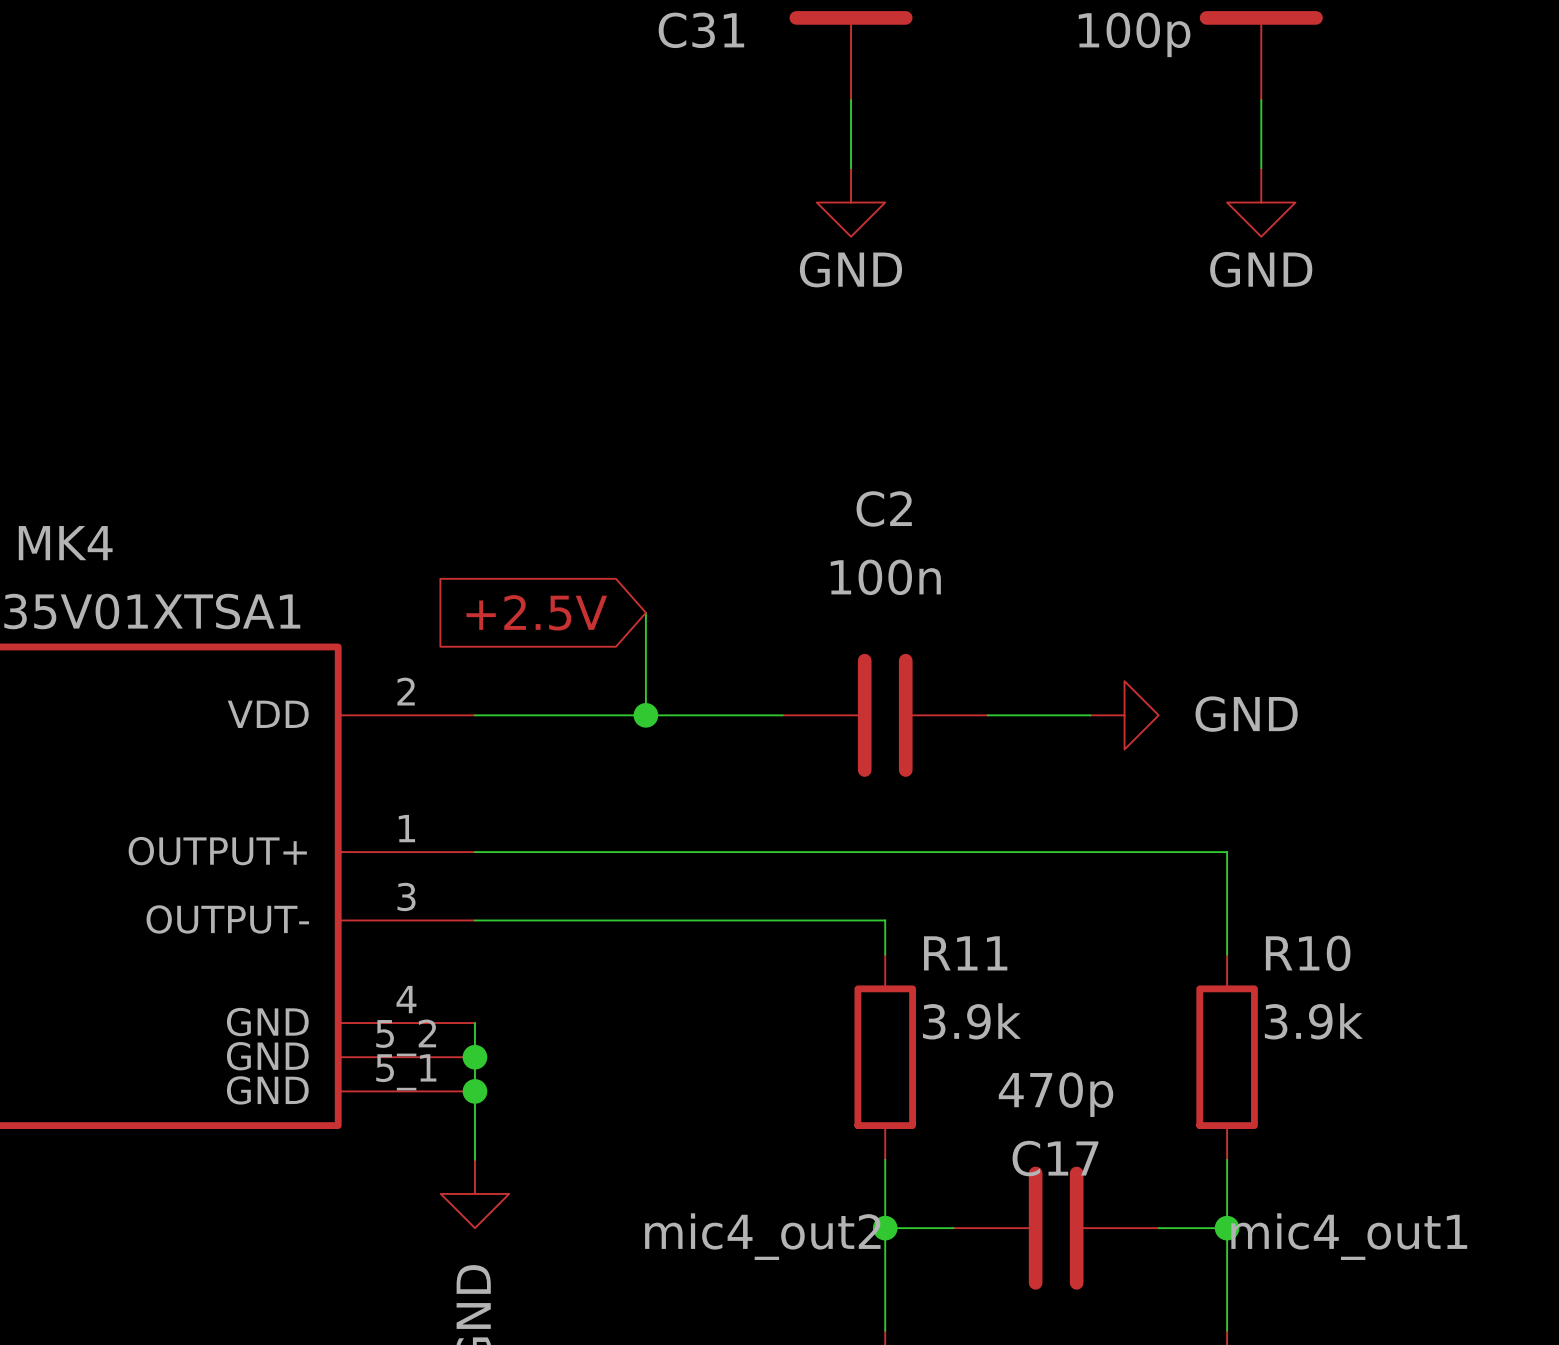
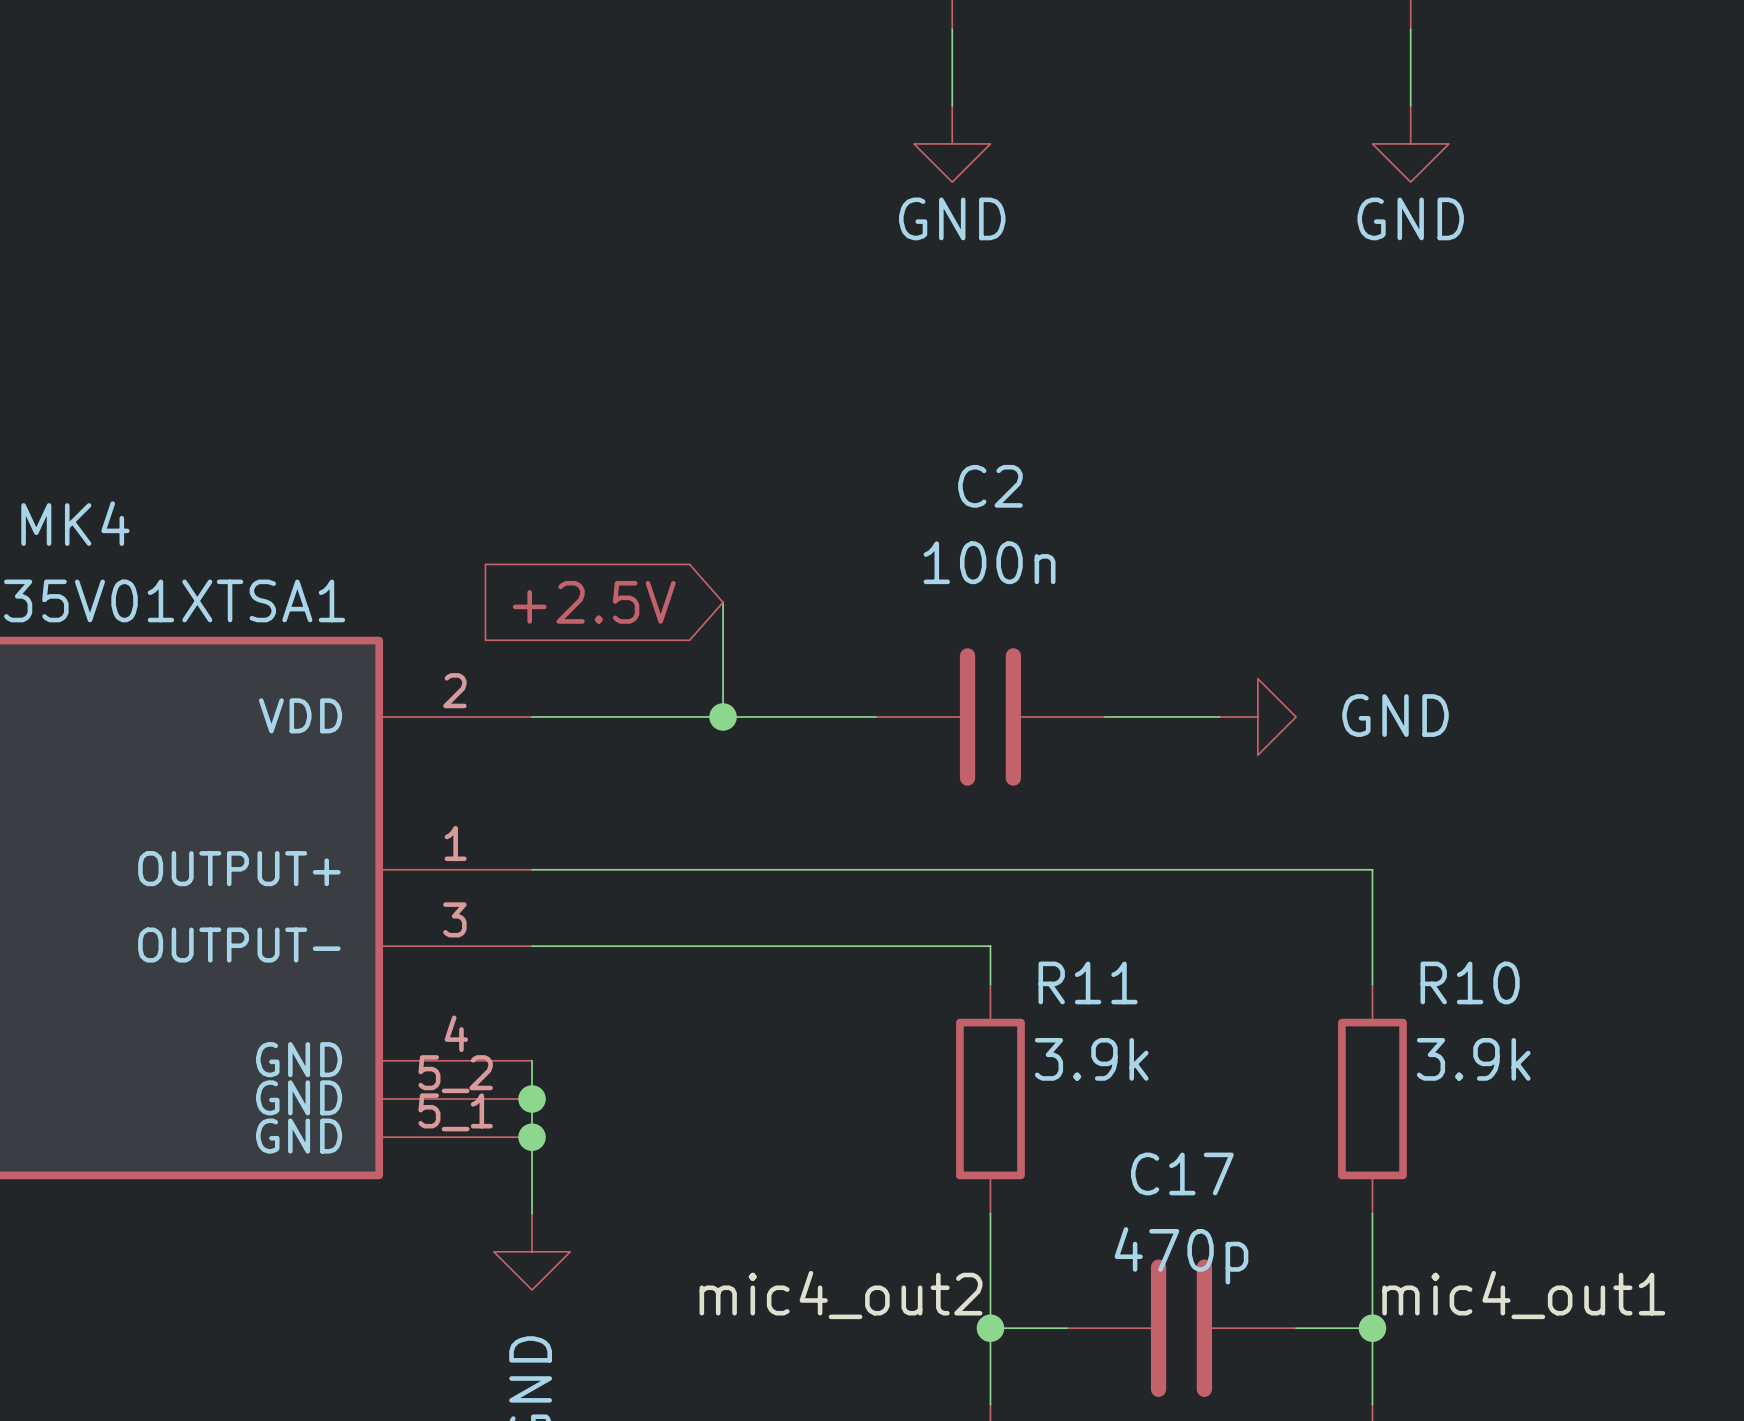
C17 value position: 470p (1056, 1094) -> 470p (1181, 1255)
C17 name position: C17 (1055, 1158) -> C17 (1182, 1173)
wire: (885, 1228) (953, 1228) -> (990, 1328) (1066, 1328)
junction position: (885, 1228) -> (990, 1328)
C17 position: (1056, 1228) -> (1181, 1328)
wire: (1158, 1228) (1227, 1228) -> (1296, 1328) (1372, 1328)
junction position: (1227, 1228) -> (1372, 1328)

